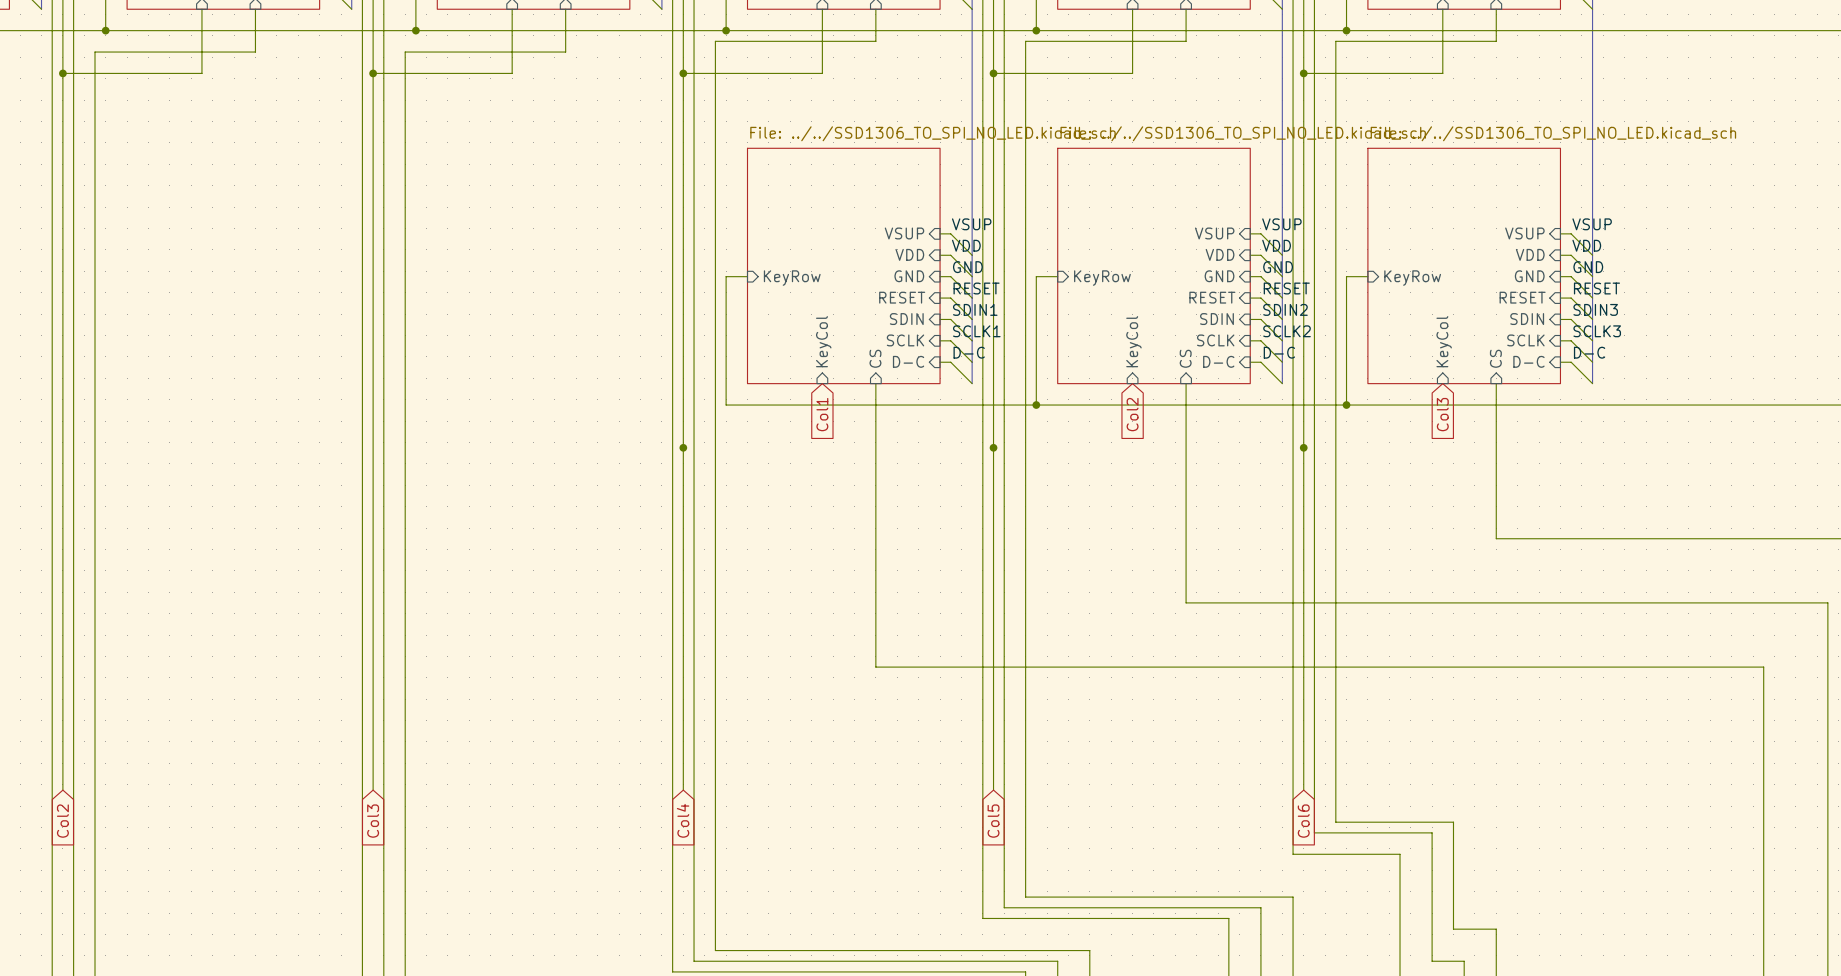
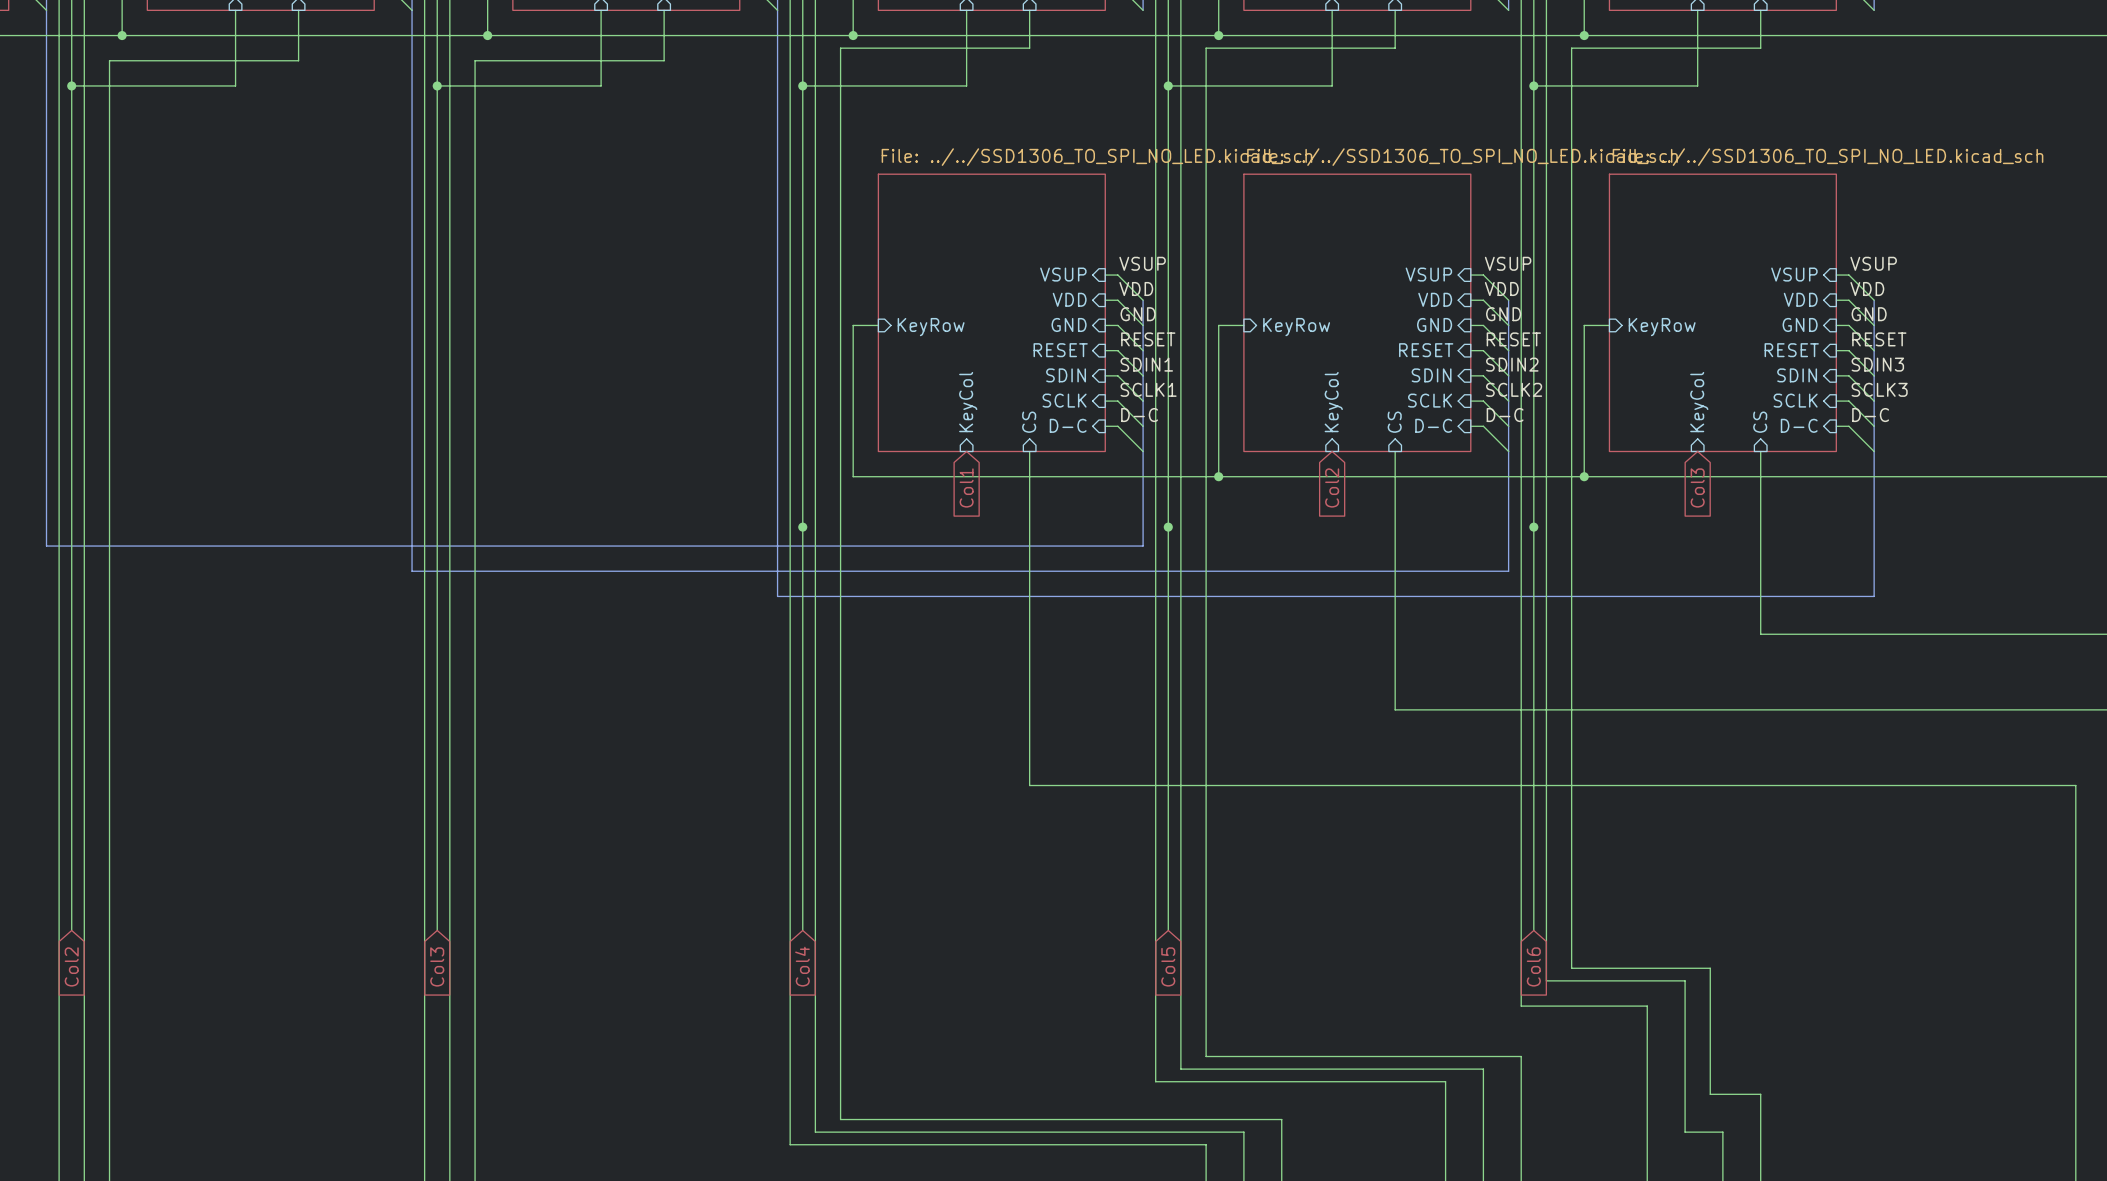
bus: none -> (46, 10) (46, 546) (1143, 546) (1143, 451)
bus: none -> (412, 10) (412, 571) (1508, 571) (1508, 451)
bus: none -> (777, 10) (777, 596) (1874, 596) (1874, 451)
bus: (972, 9) (972, 255) -> none
bus: (1282, 9) (1282, 255) -> none
bus: (1592, 9) (1592, 255) -> none

